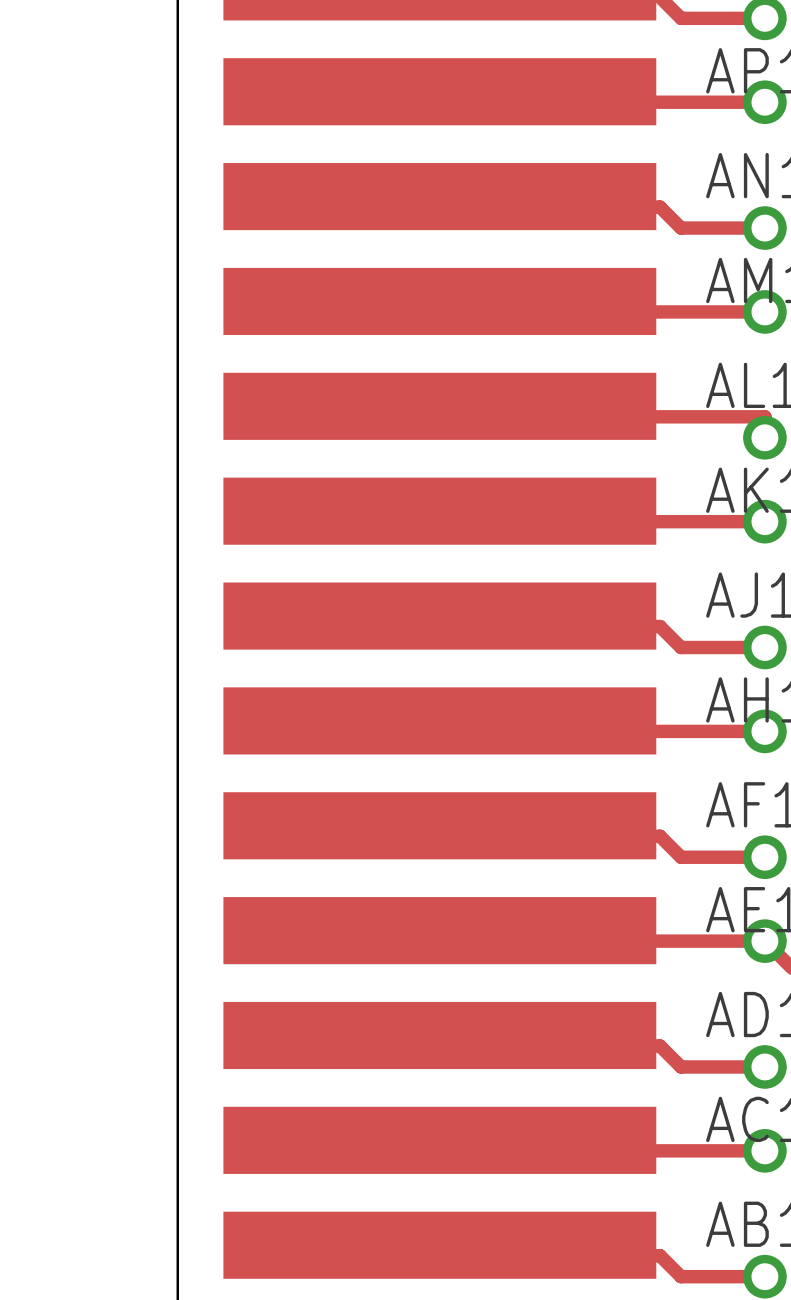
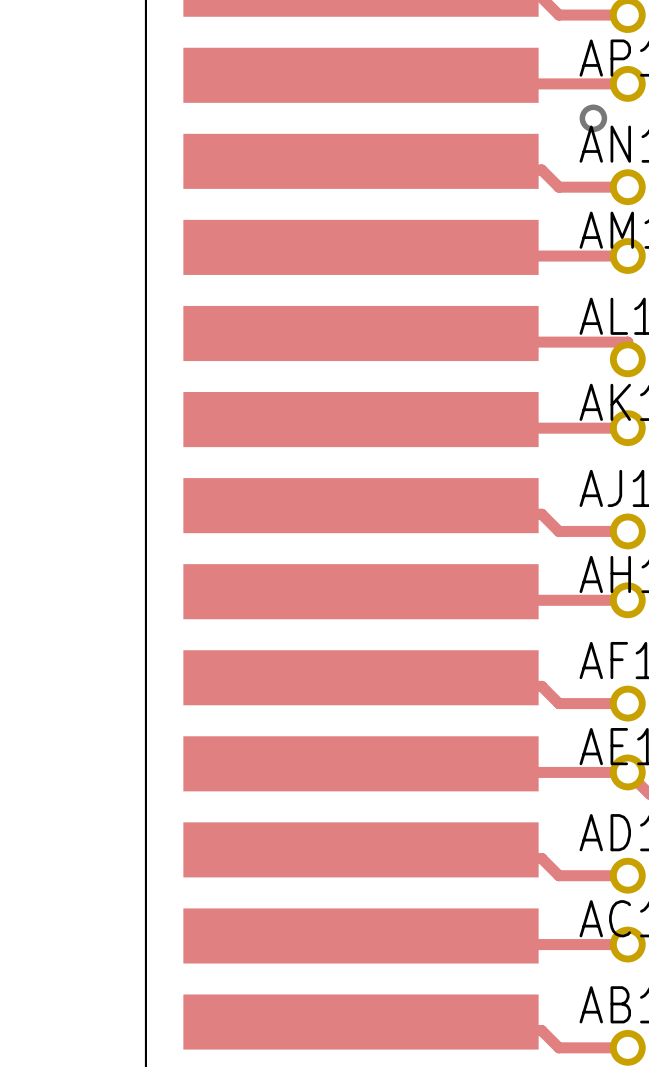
via: none -> (593, 118)

